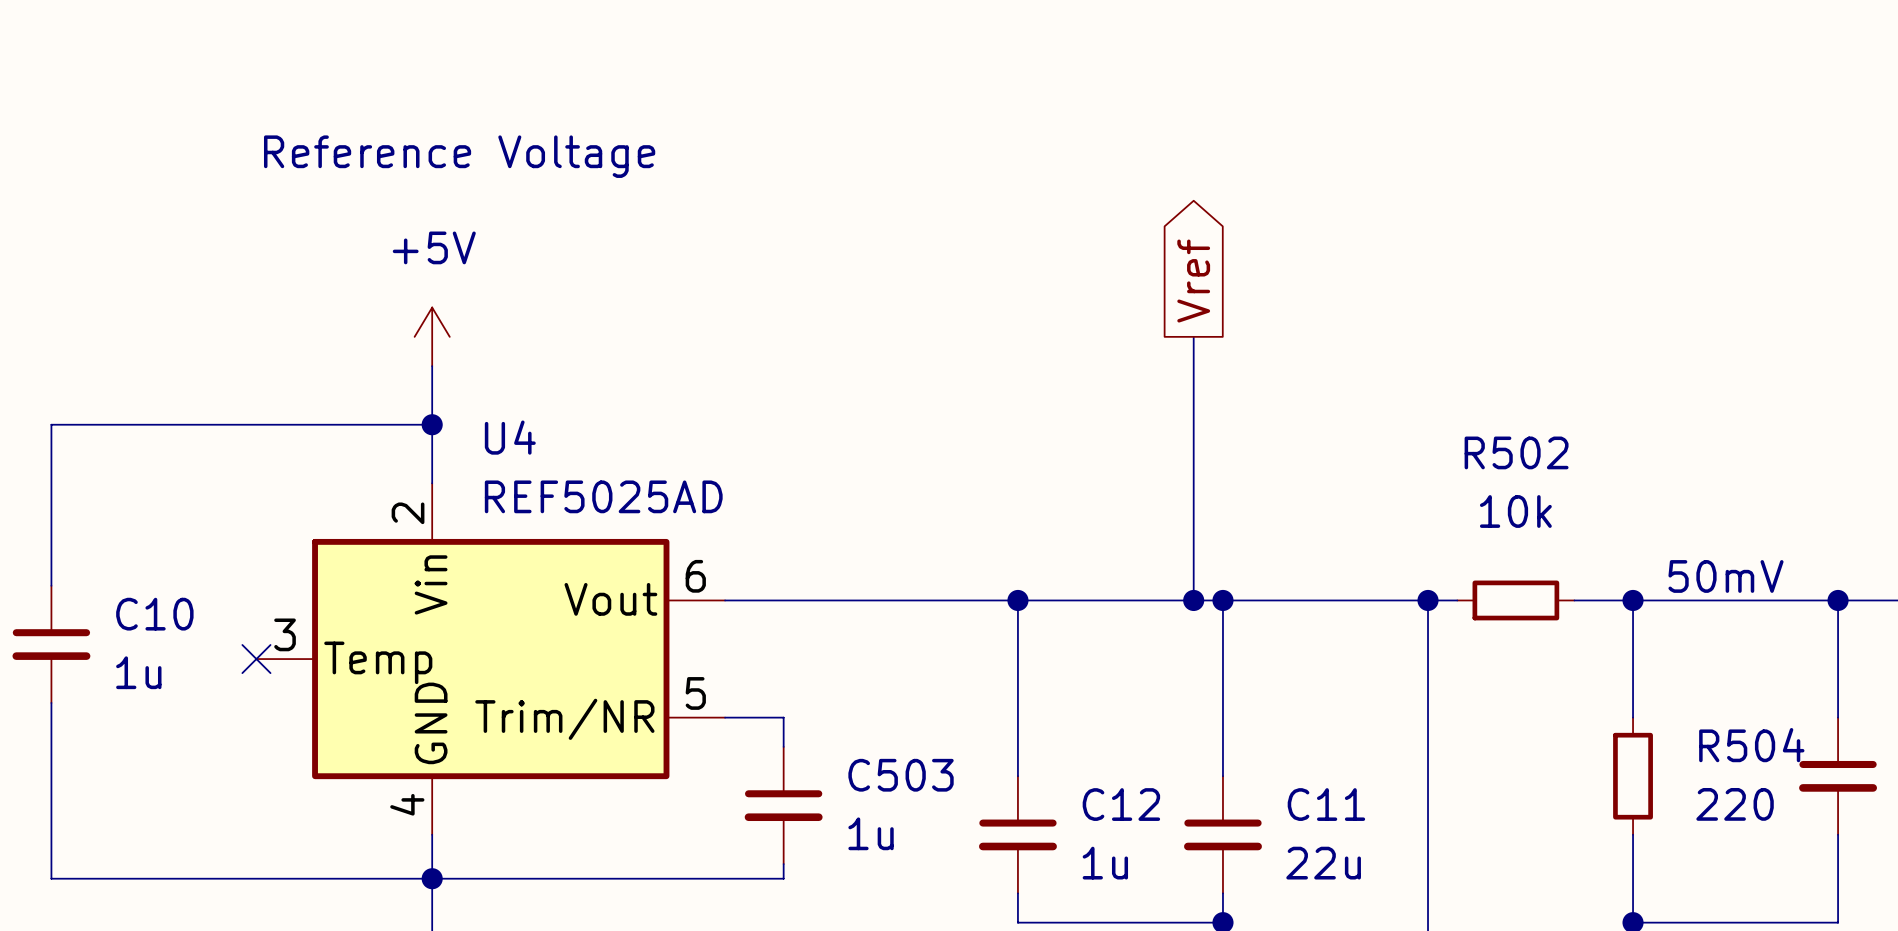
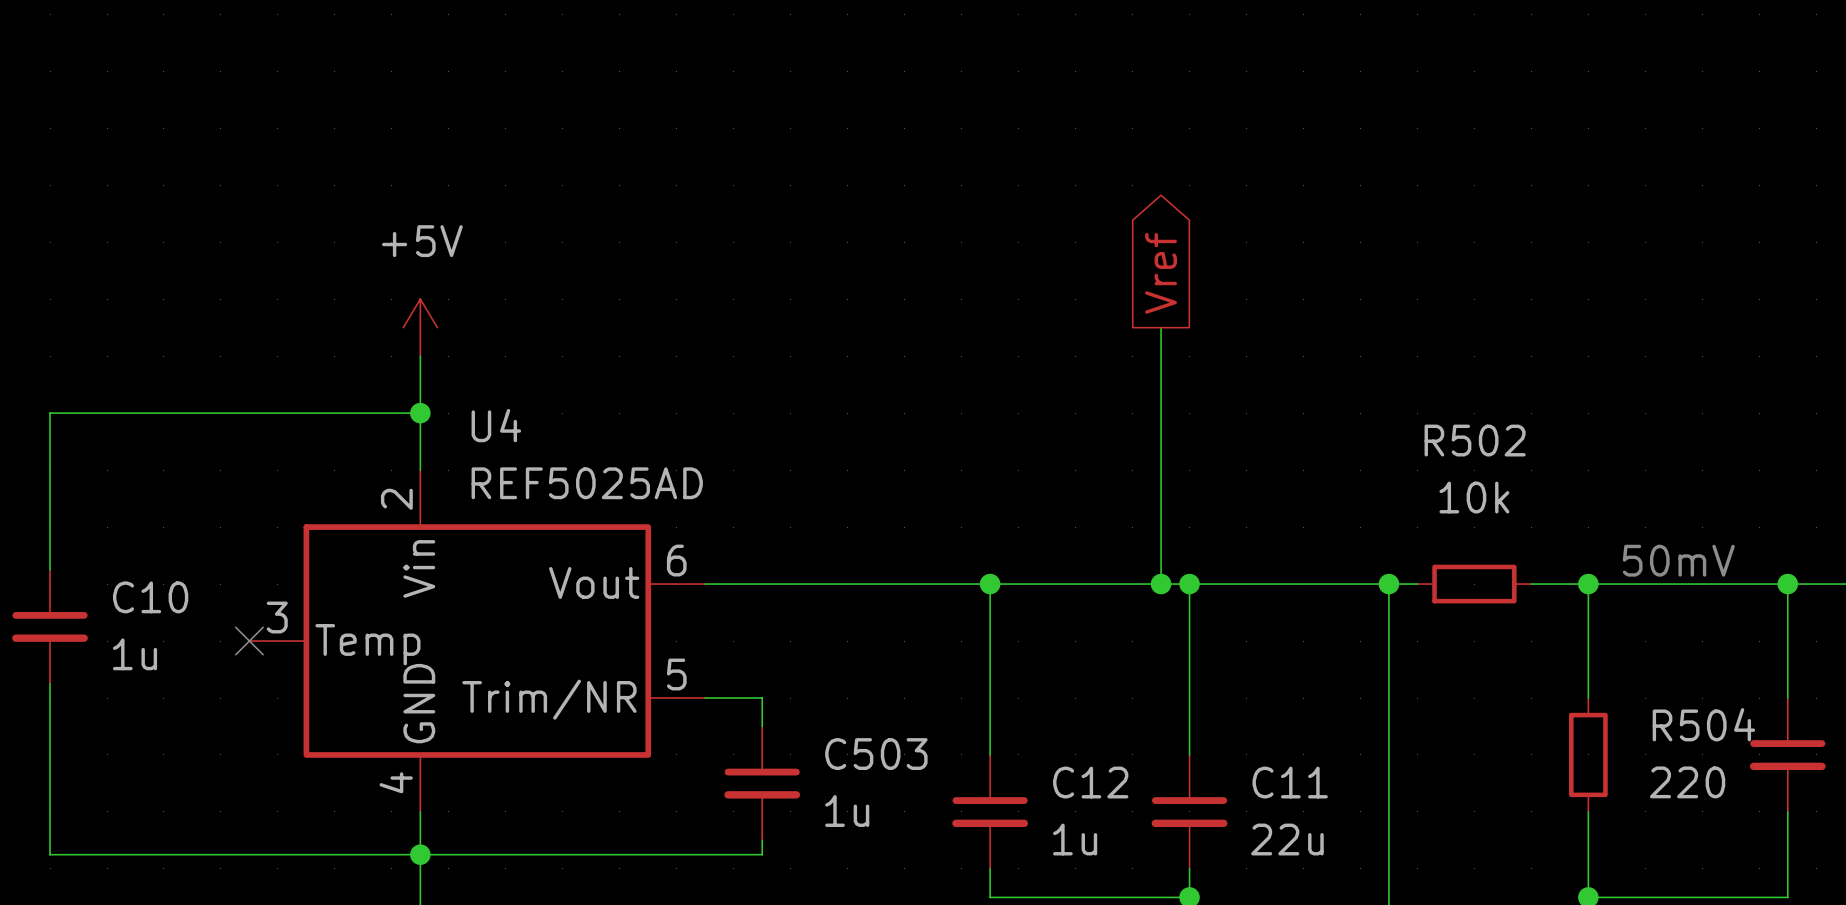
text: Reference Voltage (459, 156) -> none

